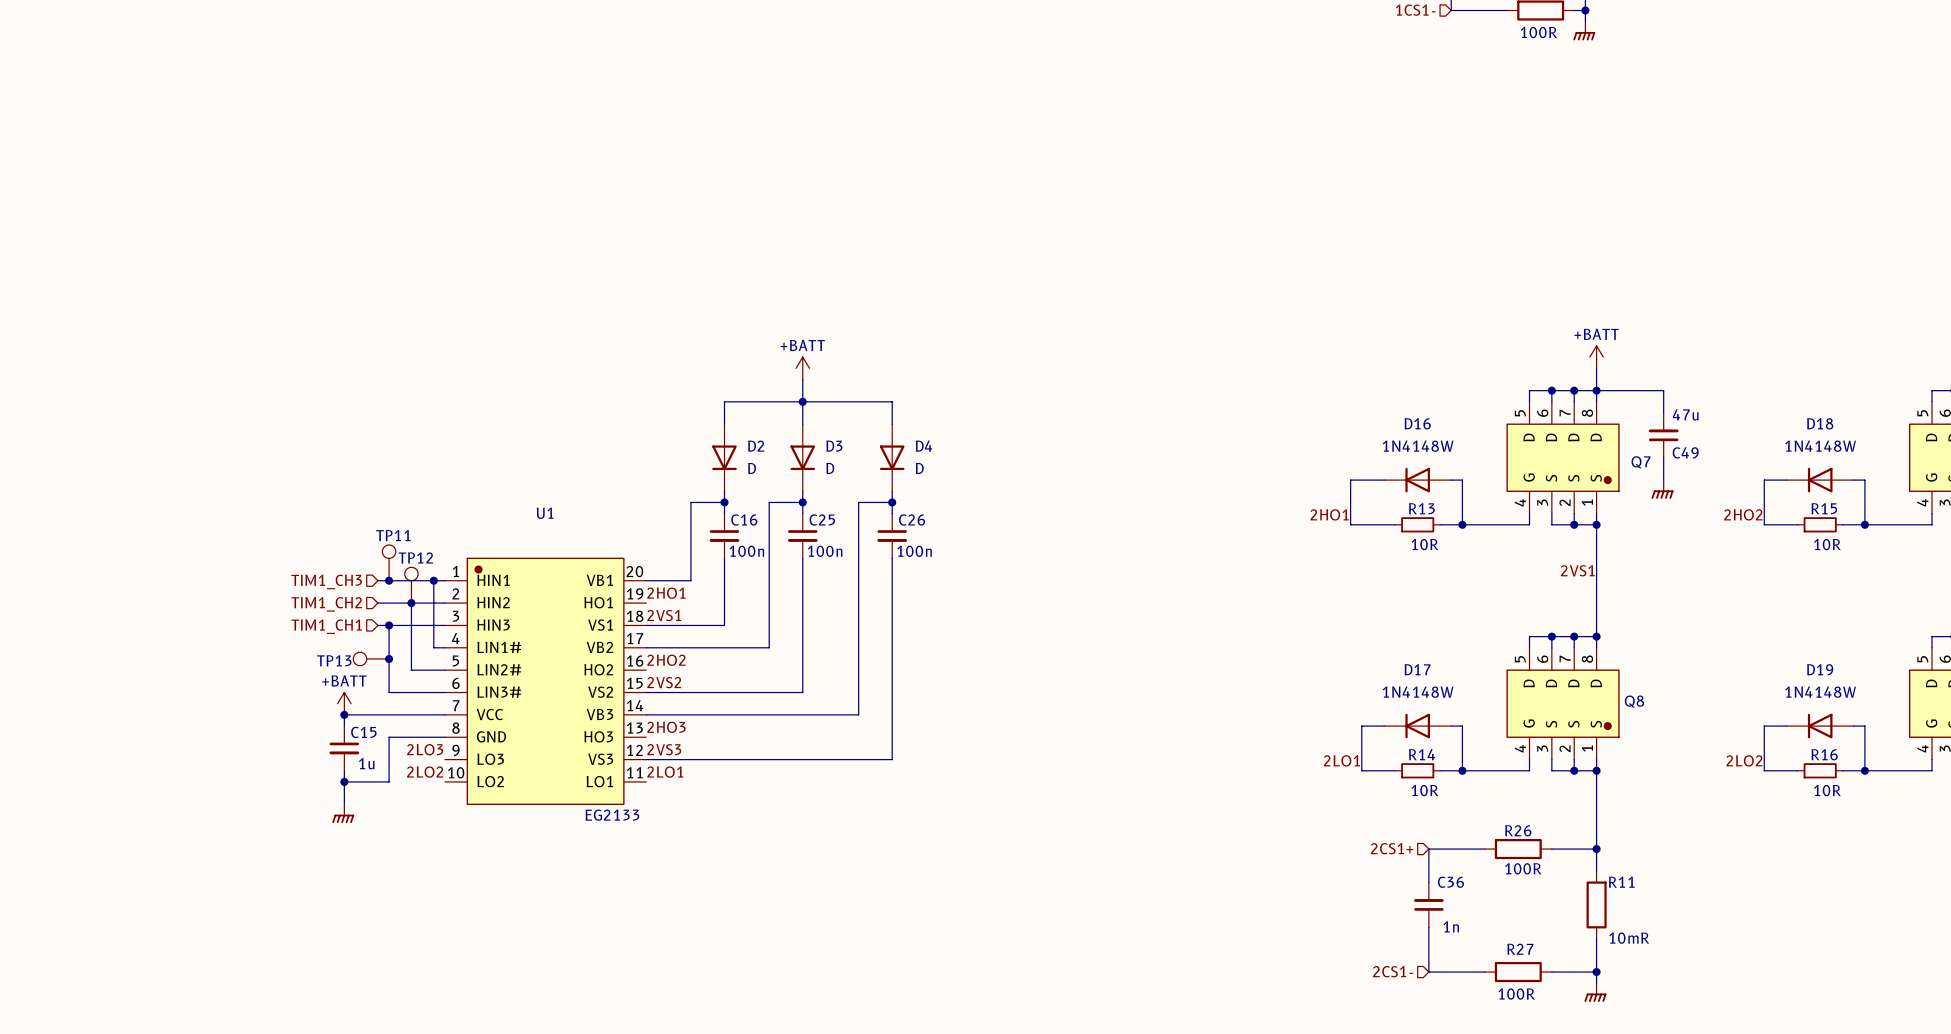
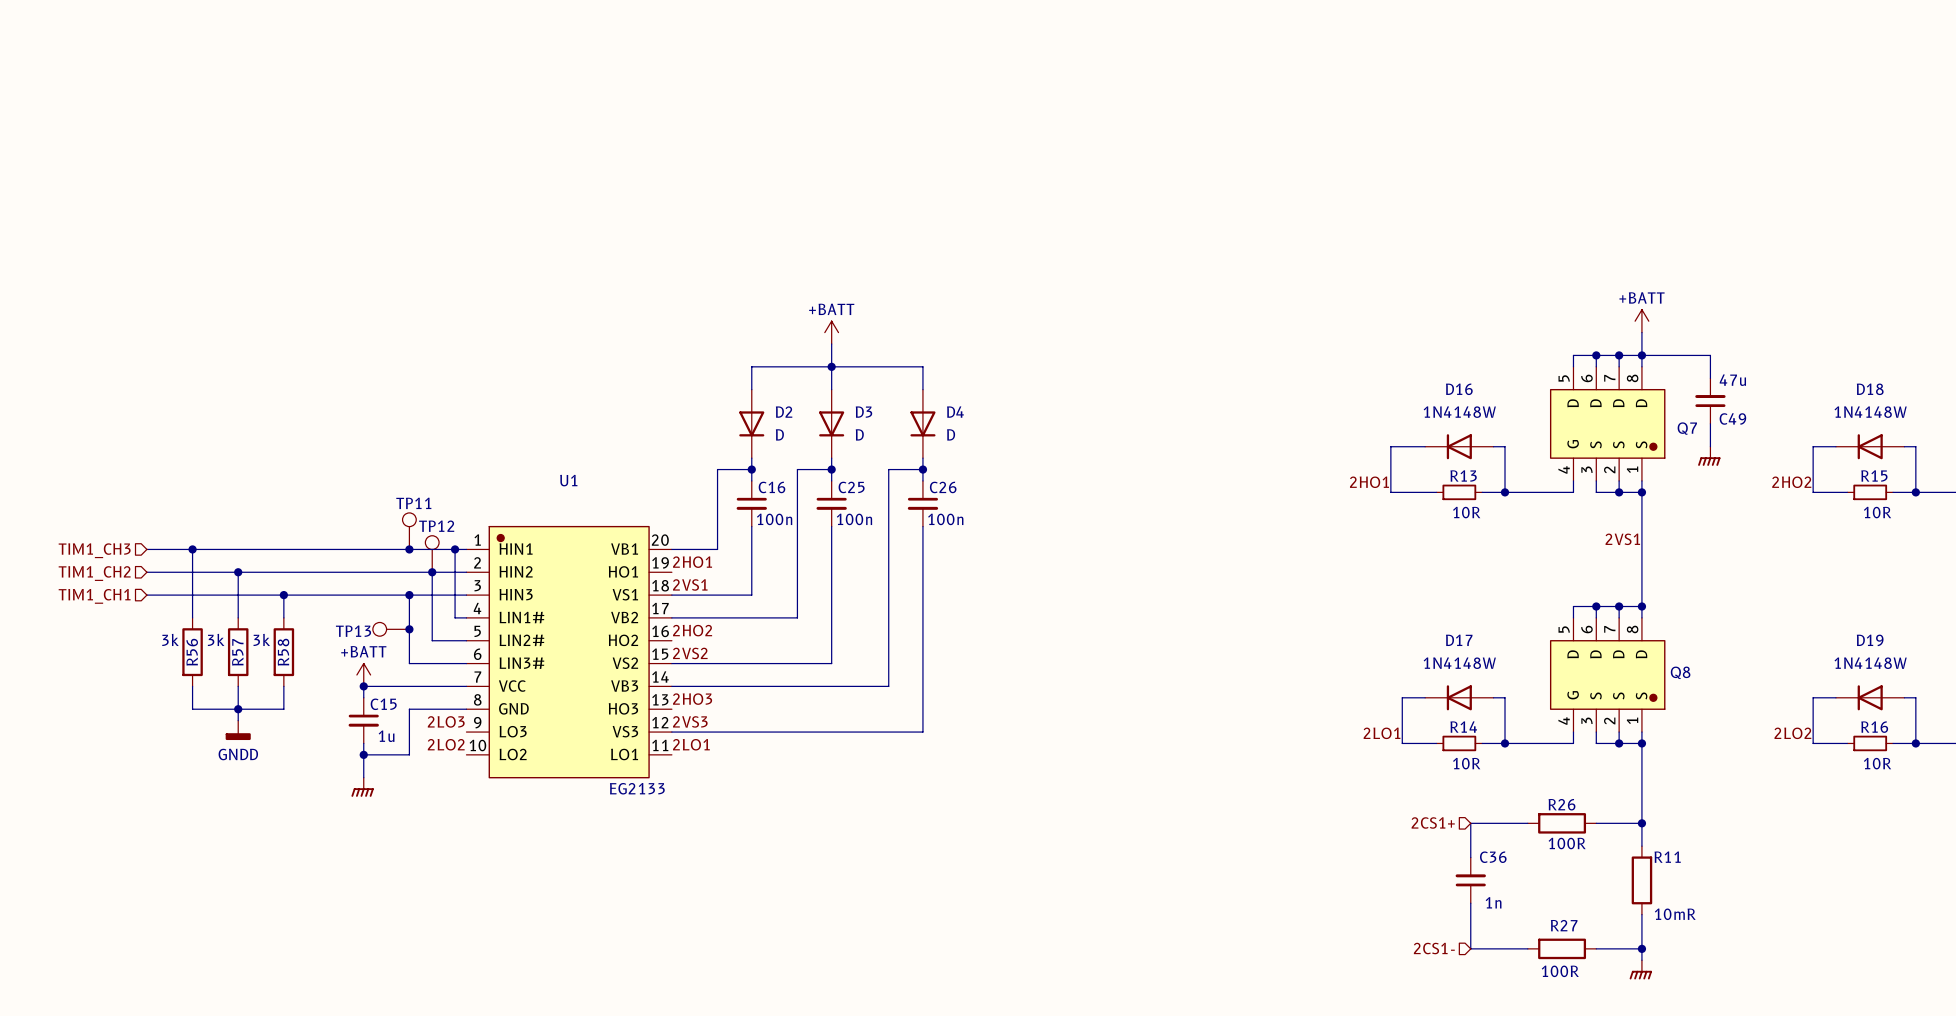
wire: none -> (146, 549) (397, 549)
wire: none -> (192, 549) (192, 617)
junction: none -> (192, 549)
hierarchical label: none -> TIM1_CH3 (94, 550)
hierarchical label: TIM1_CH3 (326, 581) -> none
wire: none -> (146, 572) (397, 572)
wire: none -> (238, 572) (238, 617)
junction: none -> (238, 572)
hierarchical label: none -> TIM1_CH2 (94, 573)
hierarchical label: TIM1_CH2 (326, 604) -> none
wire: none -> (146, 595) (397, 595)
wire: none -> (283, 595) (283, 617)
junction: none -> (283, 595)
hierarchical label: none -> TIM1_CH1 (94, 596)
hierarchical label: TIM1_CH1 (326, 626) -> none
R56: none -> 3k (192, 652)
R57: none -> 3k (238, 652)
R58: none -> 3k (283, 652)
wire: none -> (192, 686) (192, 709) (283, 709) (283, 686)
wire: none -> (238, 686) (238, 720)
junction: none -> (238, 709)
power symbol: none -> GNDD (238, 730)

